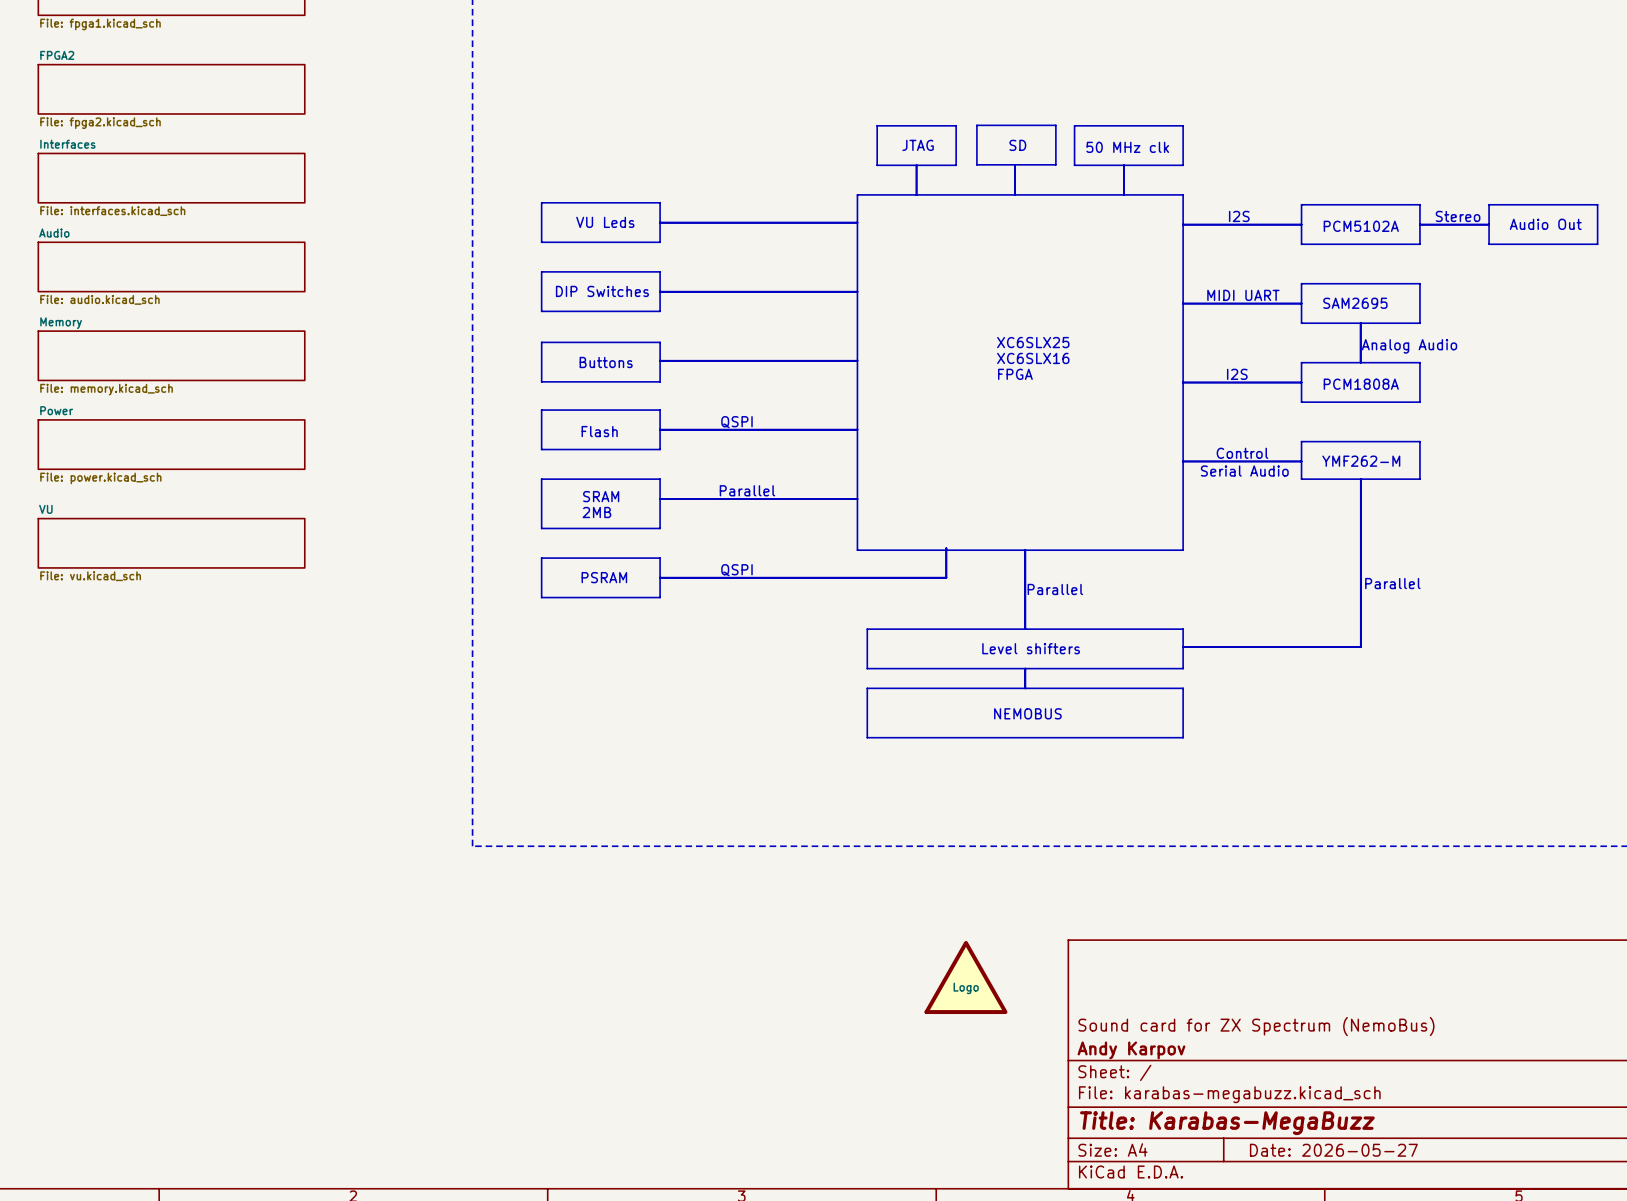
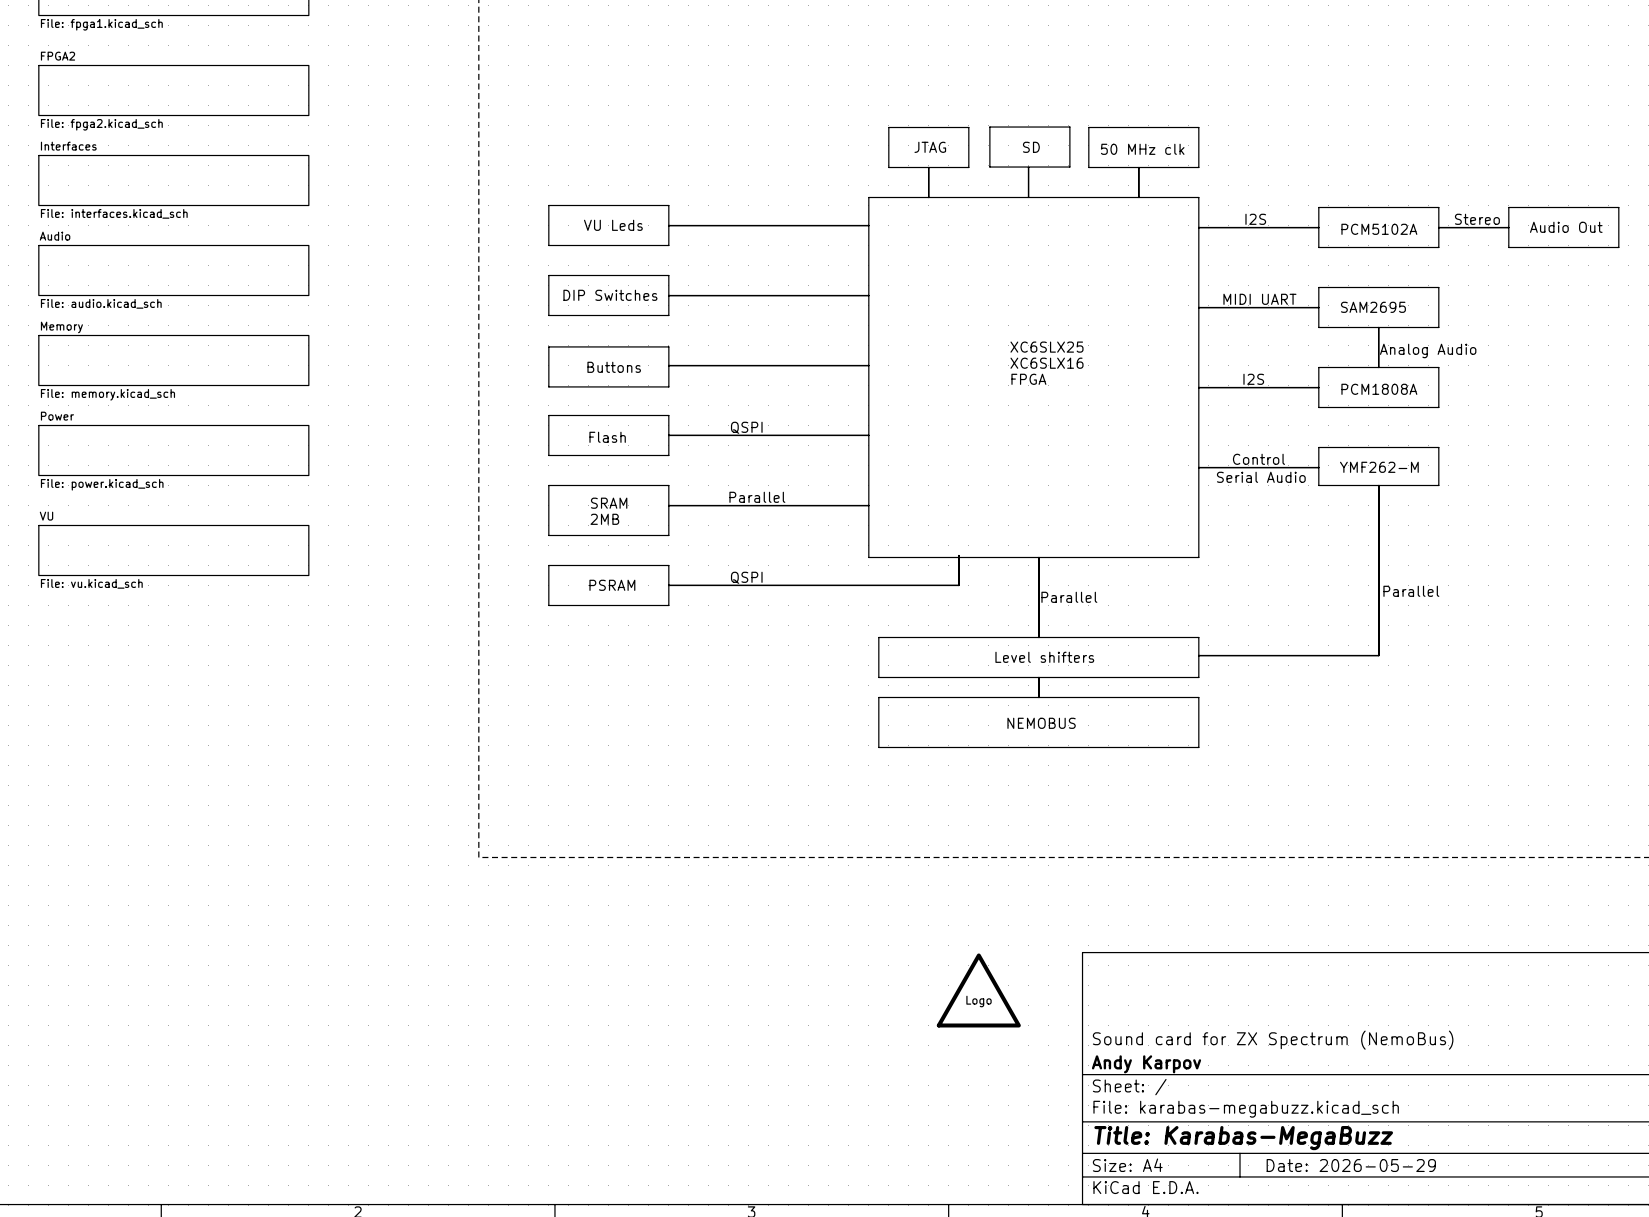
title block: Date: 2026-05-27 (1333, 1150) -> Date: 2026-05-29 (1351, 1165)

